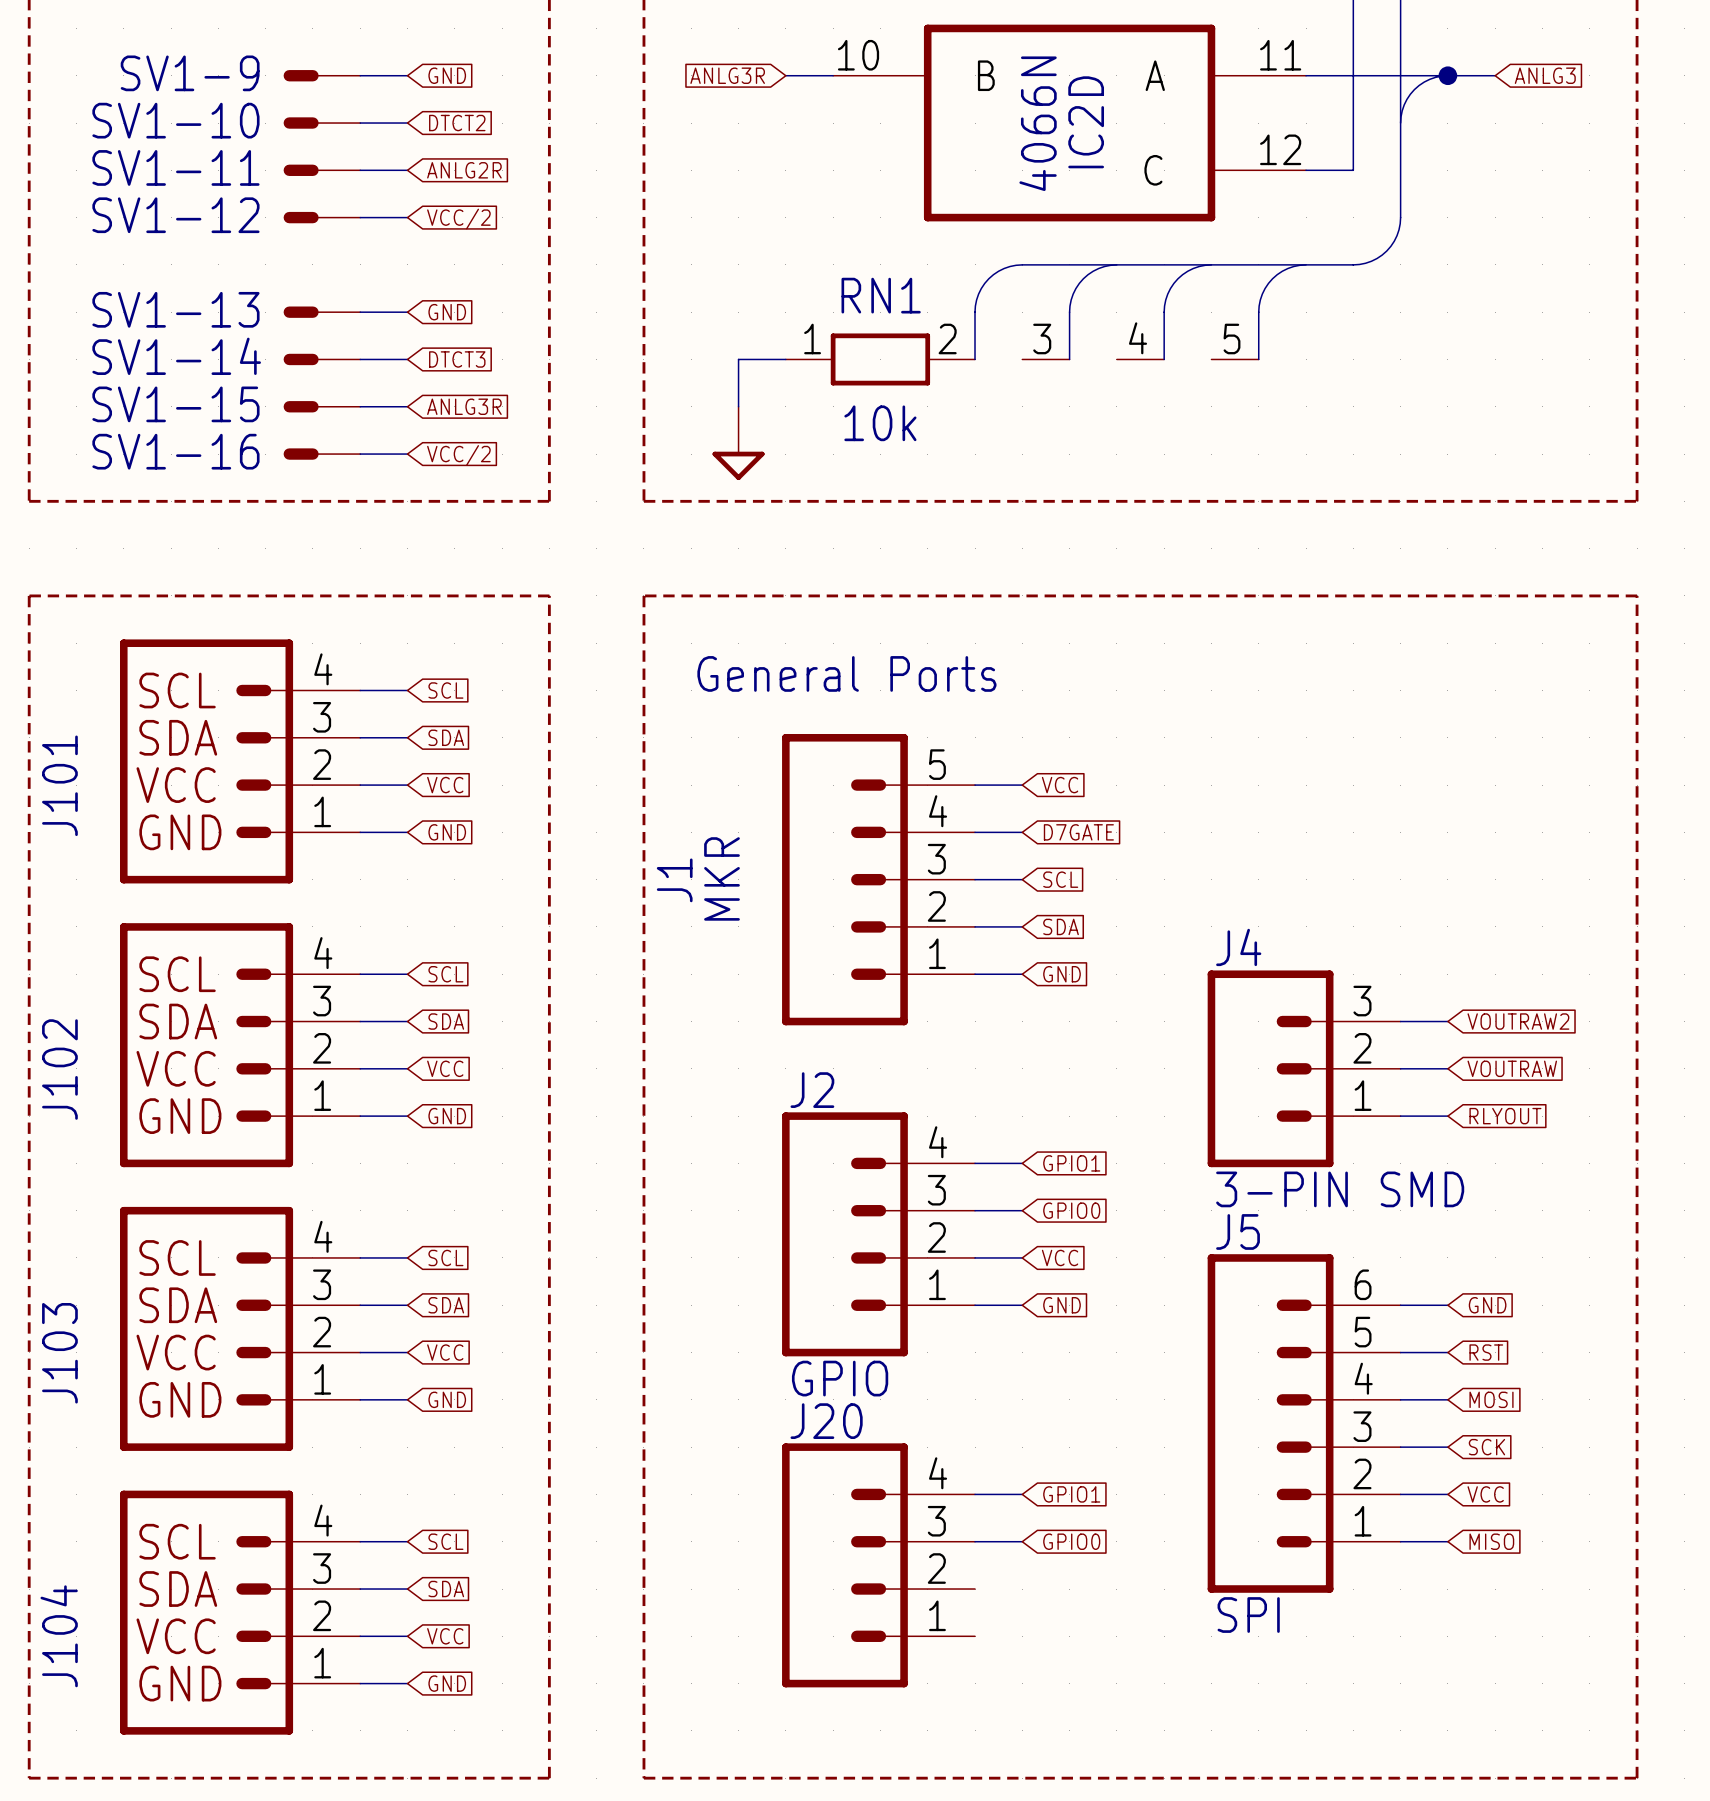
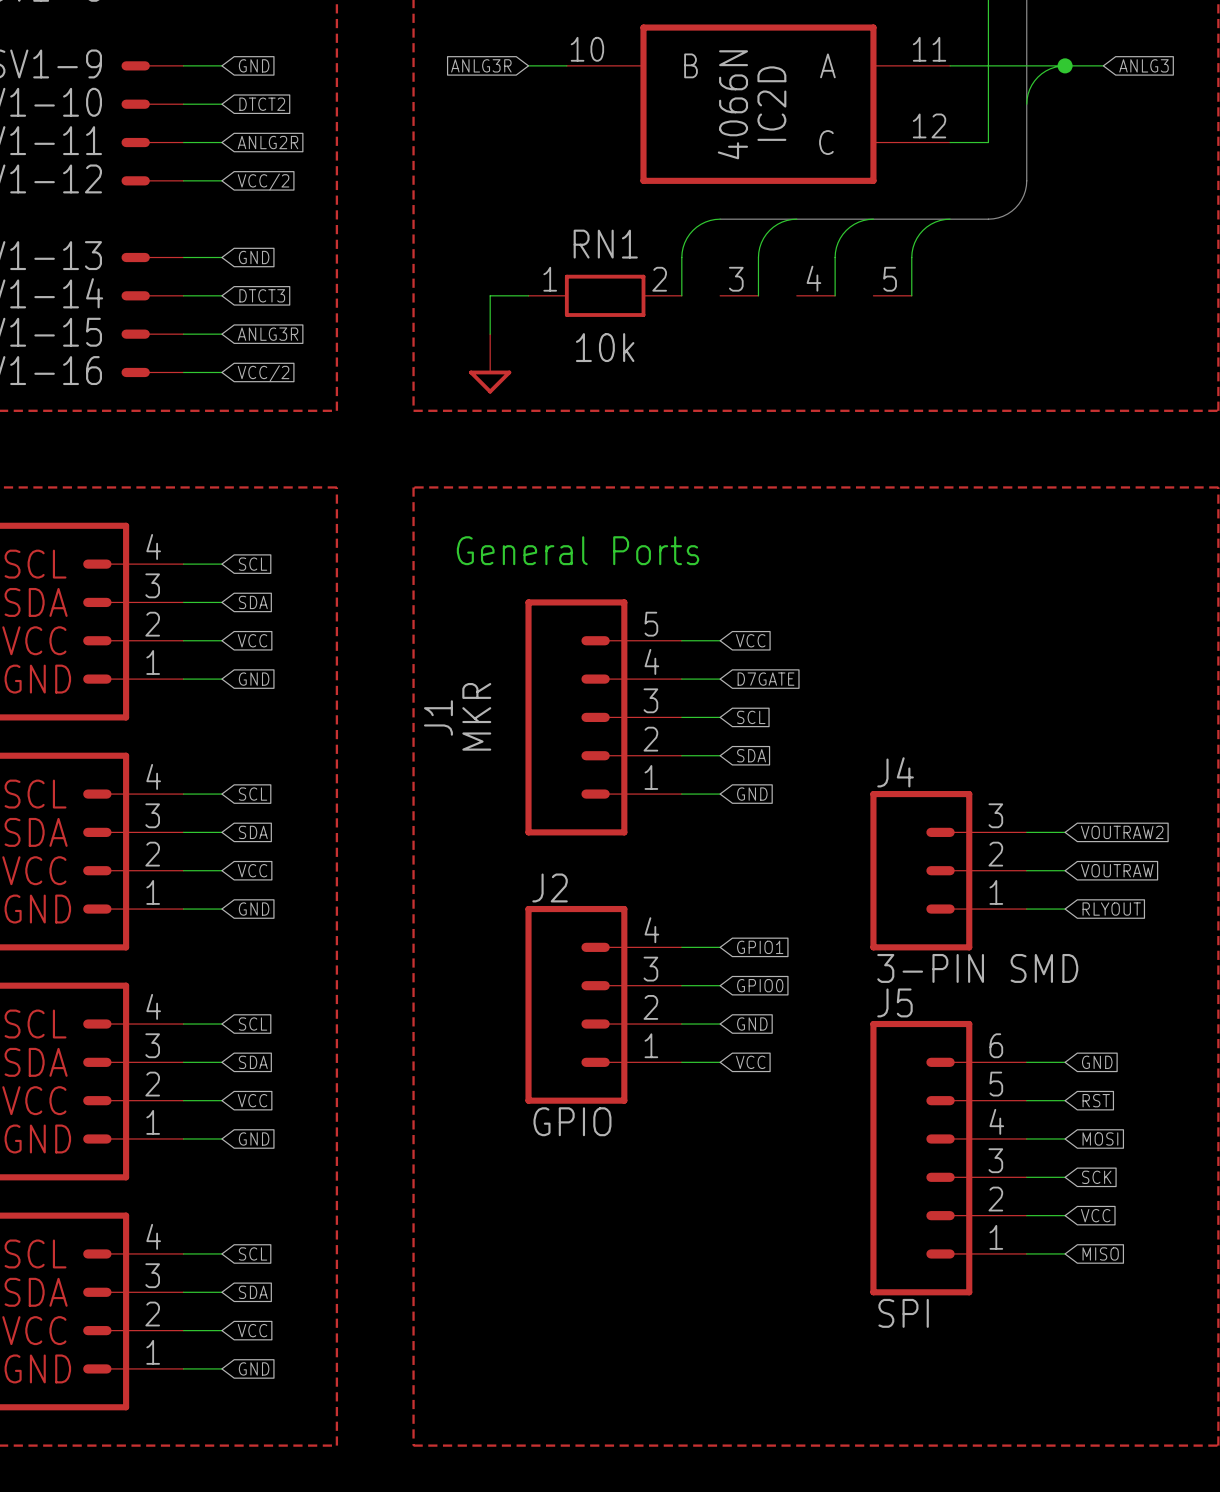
global label: VCC (1060, 1257) -> GND (752, 1024)
global label: GND (1062, 1305) -> VCC (750, 1062)
wire: (975, 1494) (1022, 1494) -> none
global label: GPIO1 (1071, 1494) -> none
wire: (975, 1541) (1022, 1541) -> none
global label: GPIO0 (1071, 1541) -> none
J20: (878, 1565) -> none

